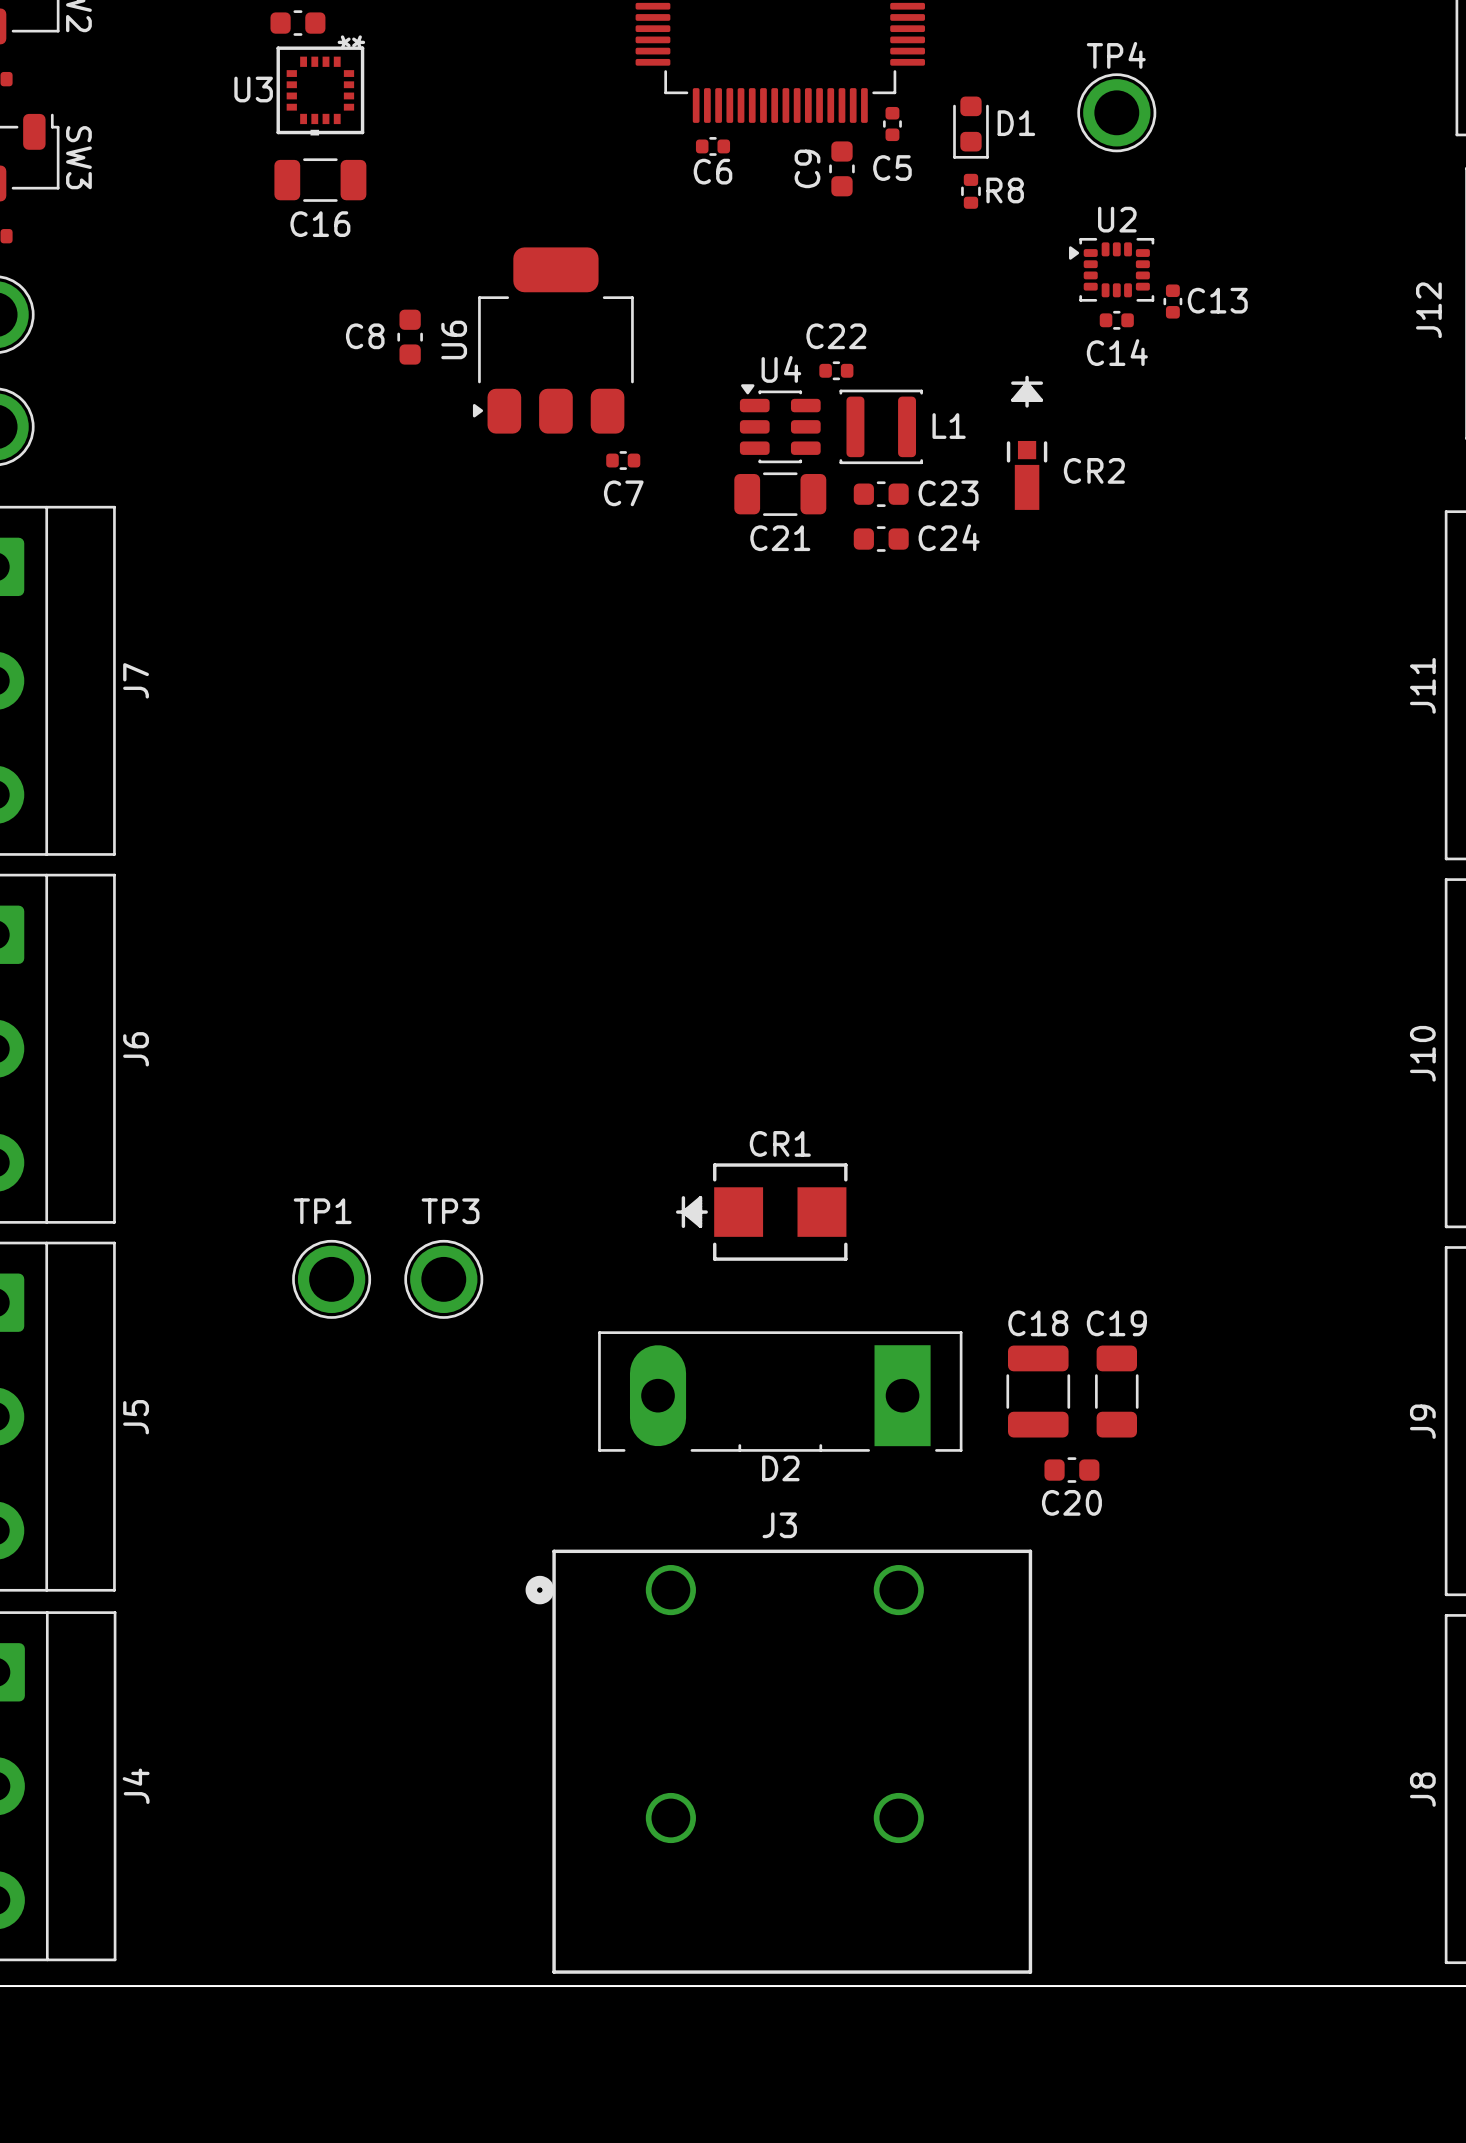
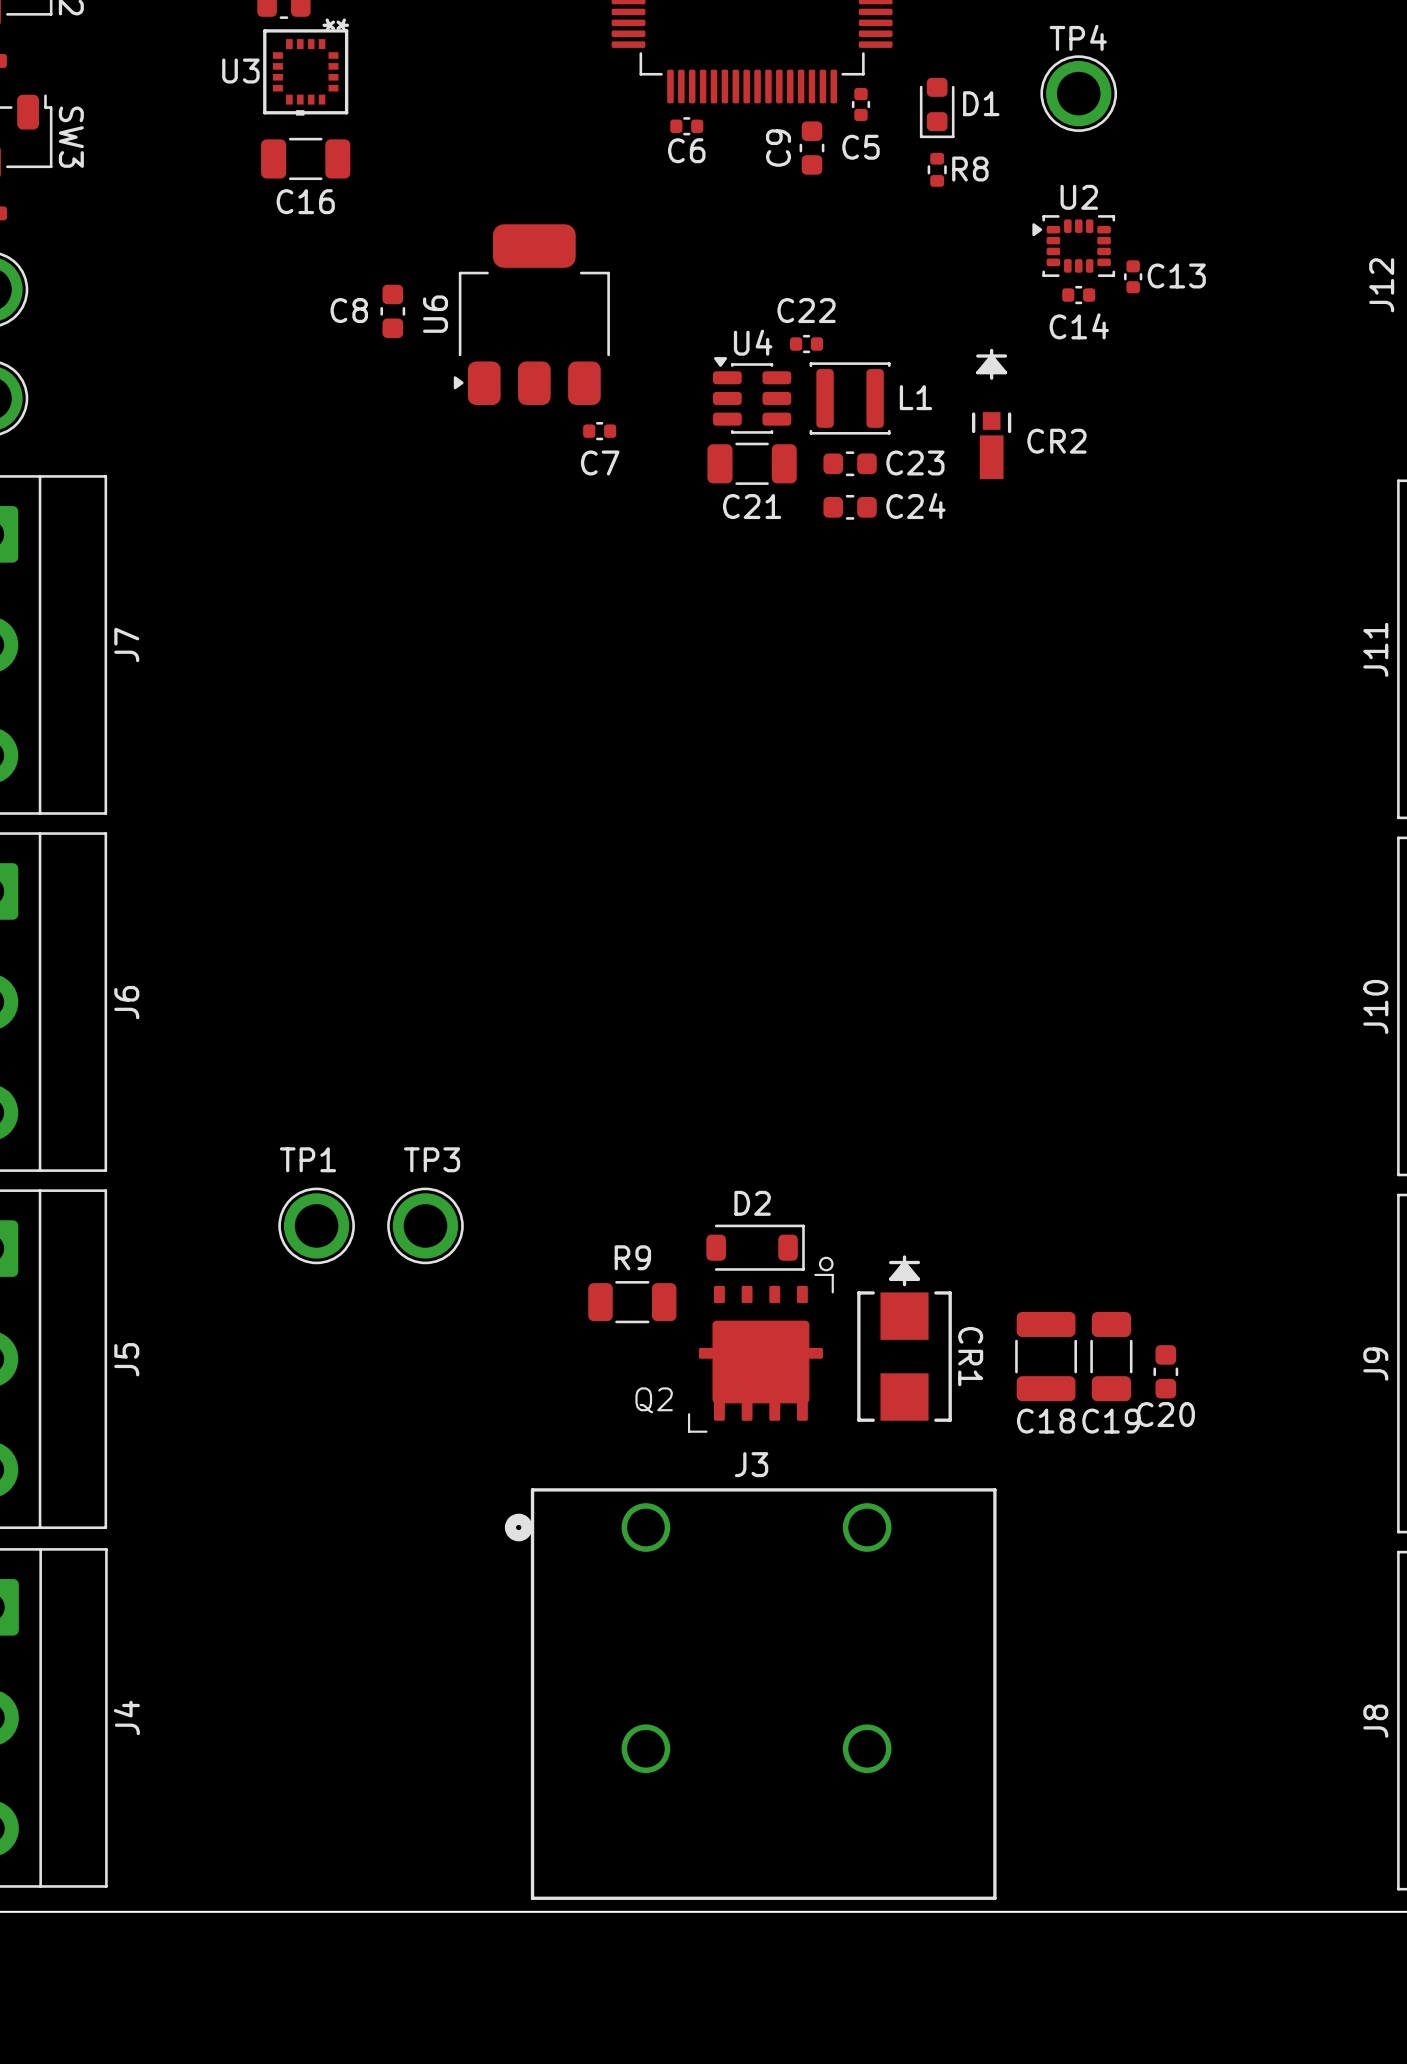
CR1 rotation: 0° (761, 1212) -> 90° clockwise (904, 1338)
CR1 position: (761, 1212) -> (904, 1338)
C18 name position: C18 (1038, 1323) -> C18 (1046, 1421)
C19 name position: C19 (1116, 1323) -> C19 (1111, 1421)
D2 footprint: [598, 1331, 963, 1452] -> [706, 1224, 805, 1271]
R9: none -> (632, 1302)
C18 position: (1038, 1391) -> (1046, 1356)
C19 position: (1116, 1391) -> (1111, 1356)
Q2: none -> (760, 1344)
D2 name position: D2 (780, 1468) -> D2 (752, 1203)
C20 rotation: 0° (1071, 1470) -> 90° clockwise (1165, 1371)
C20 position: (1071, 1470) -> (1165, 1371)

